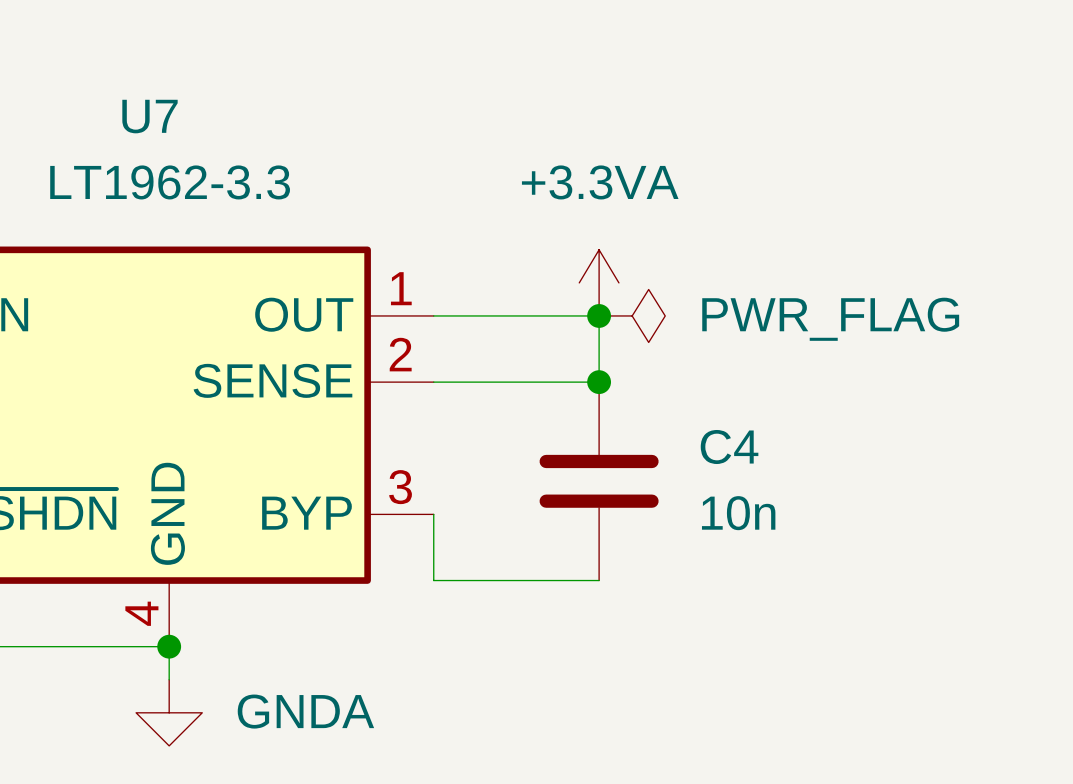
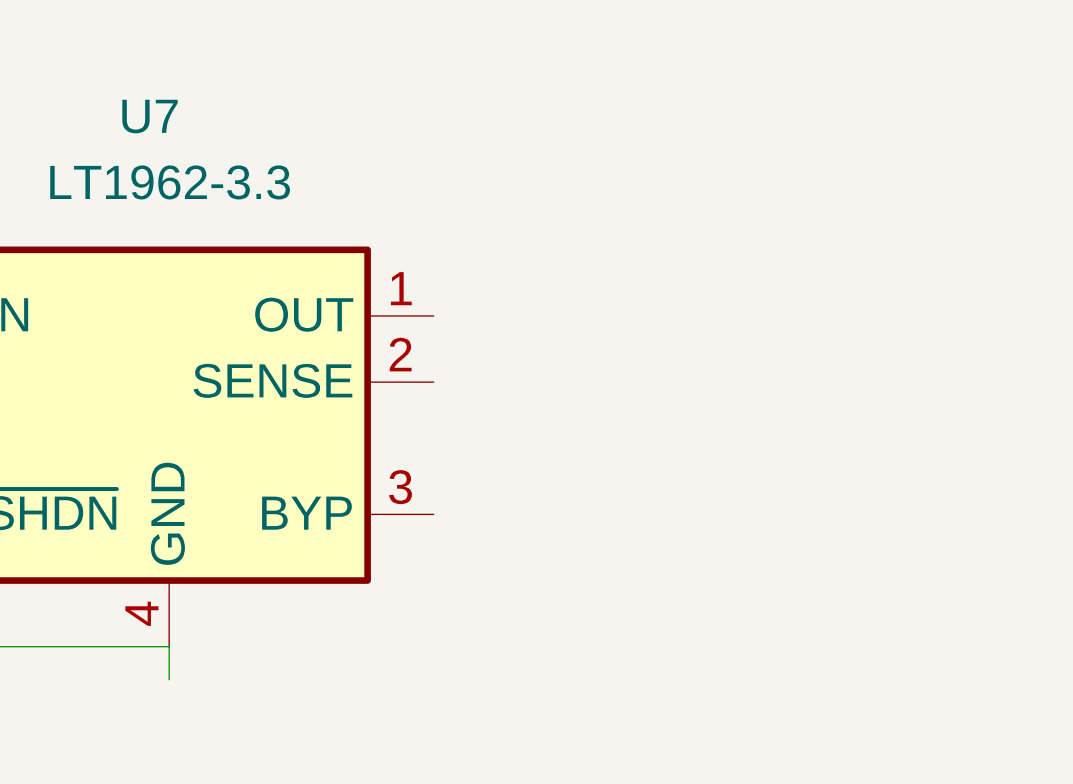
power symbol: +3.3VA (599, 282) -> none
wire: (433, 315) (599, 315) (599, 382) (433, 382) -> none
junction: (599, 315) -> none
power symbol: PWR_FLAG (632, 315) -> none
junction: (599, 382) -> none
C4: 10n (599, 481) -> none
wire: (433, 514) (433, 580) (599, 580) -> none
junction: (169, 646) -> none
power symbol: GNDA (169, 712) -> none

